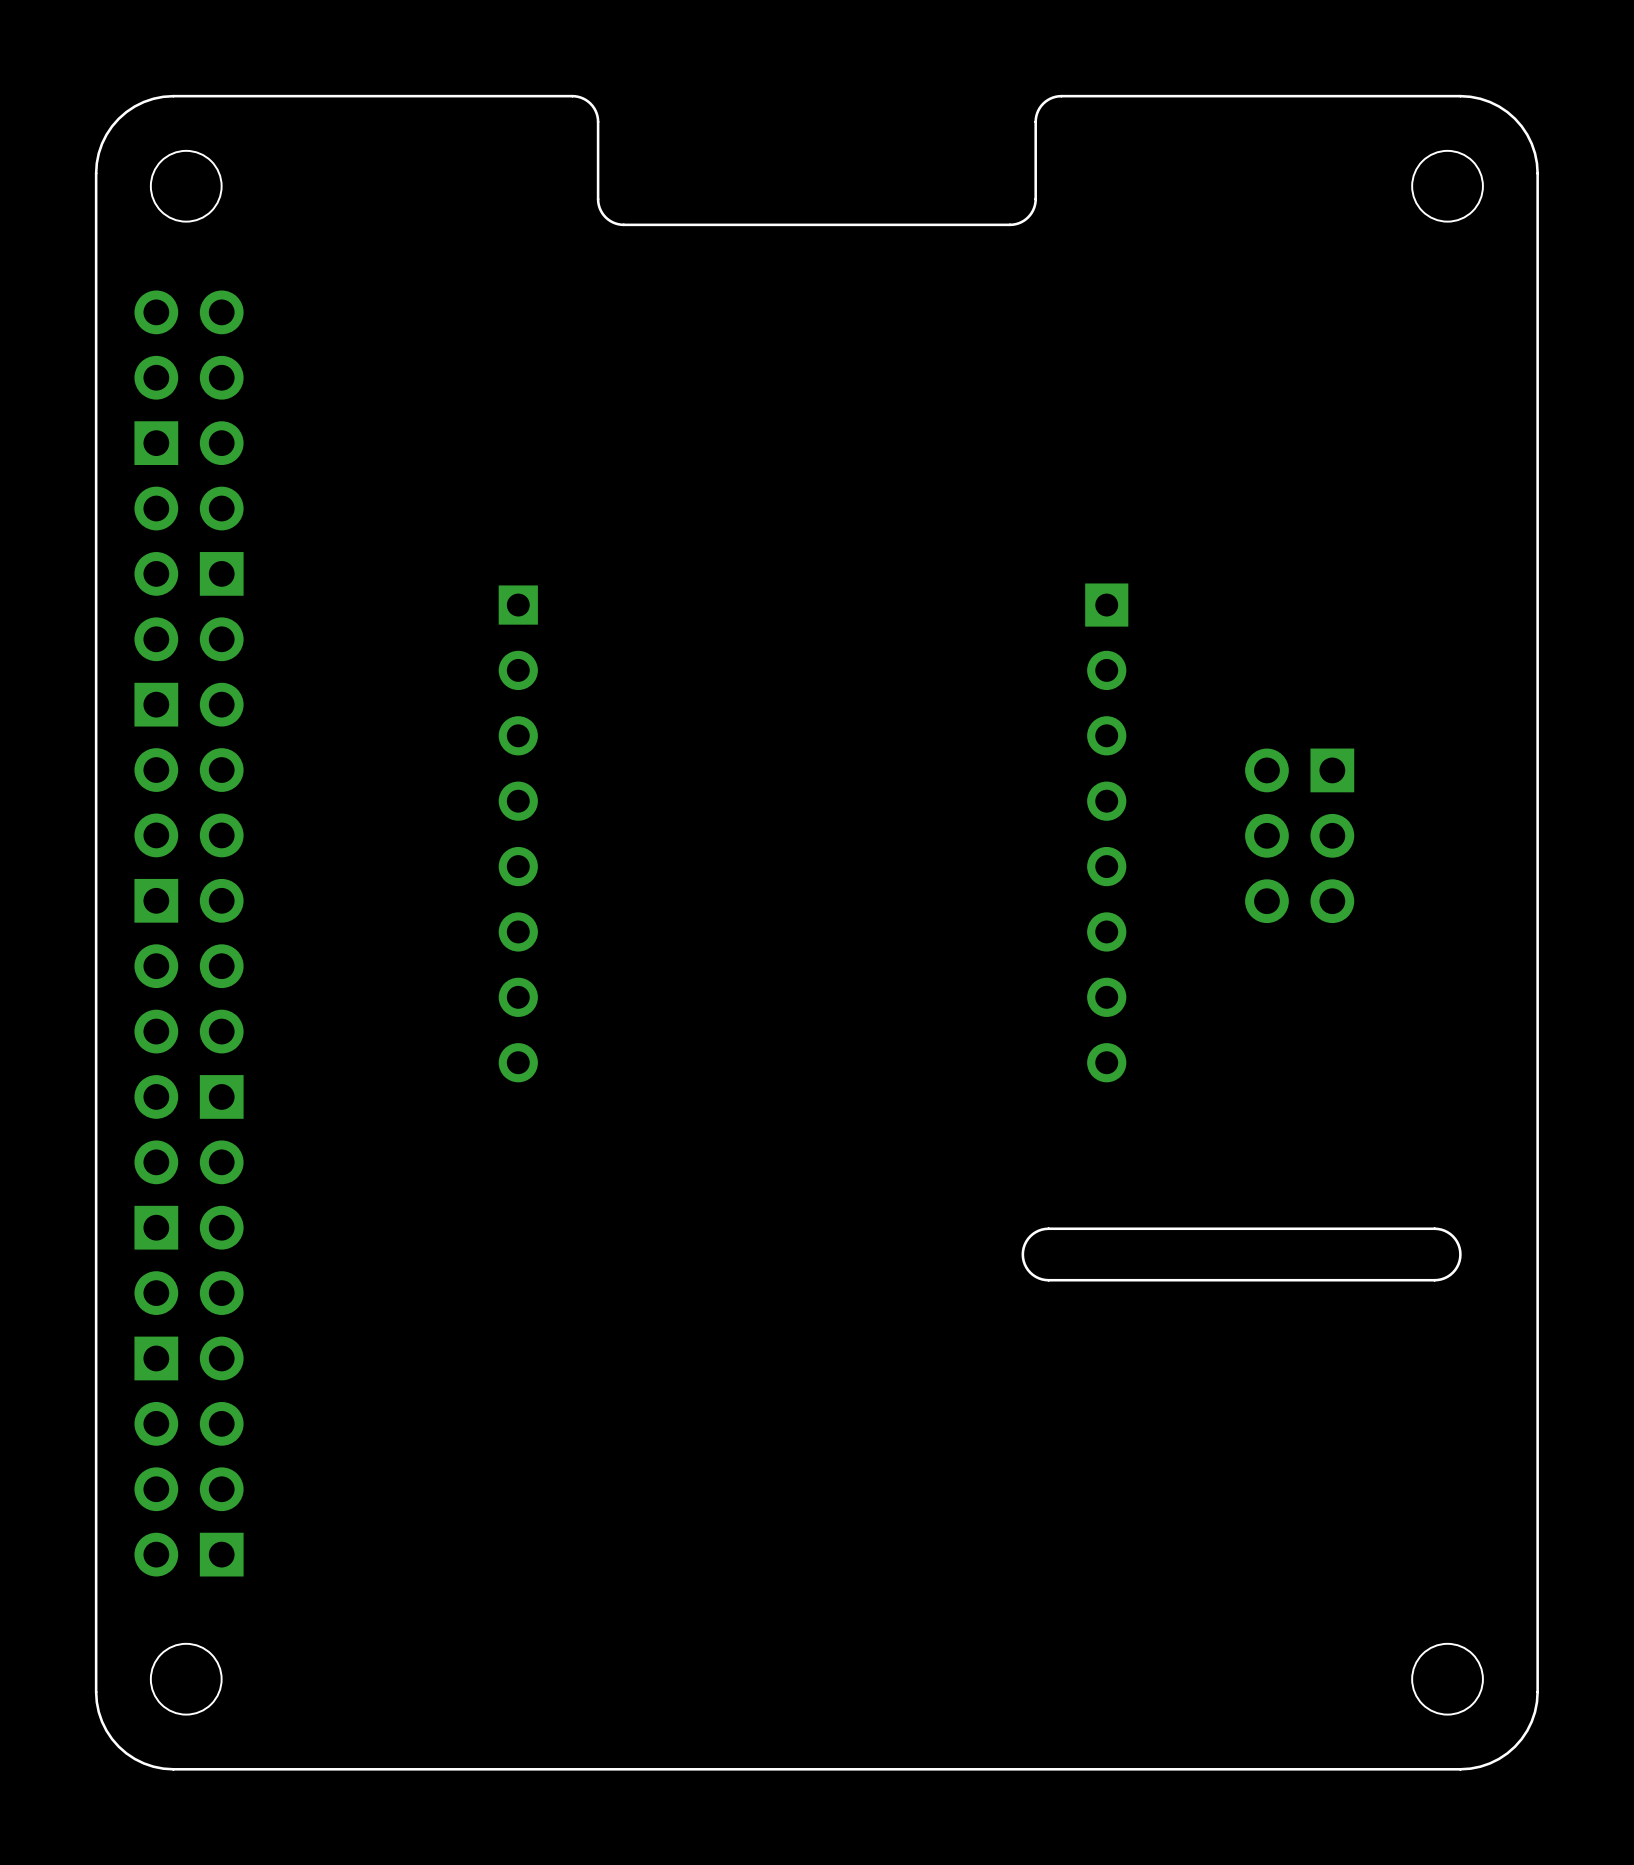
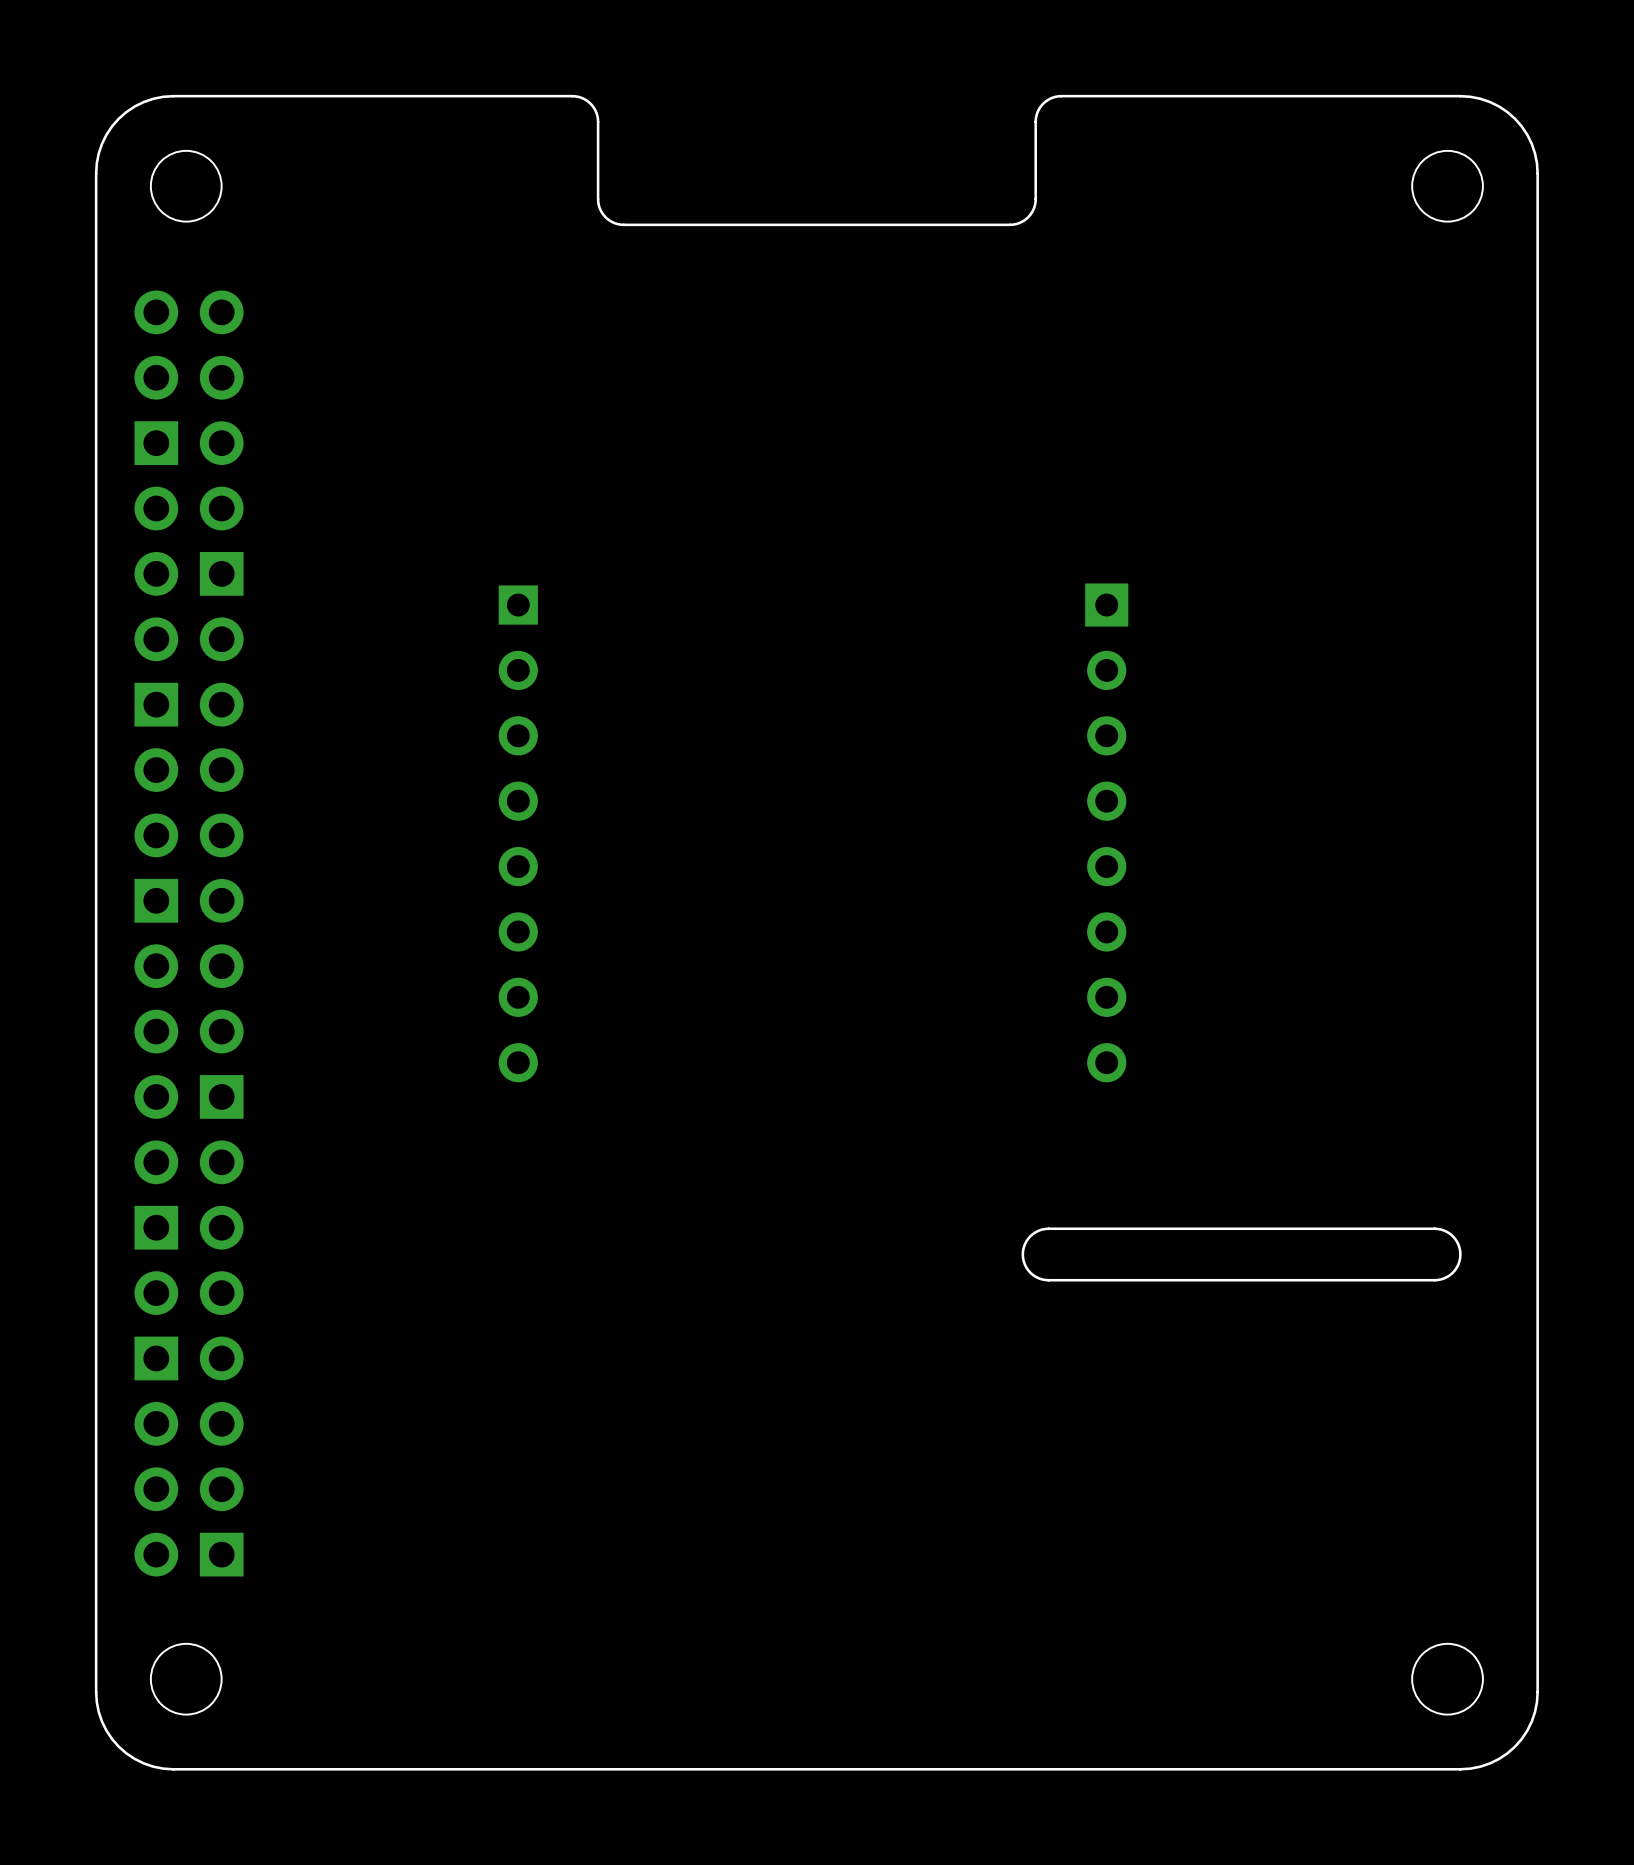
part: (1299, 835) -> none

